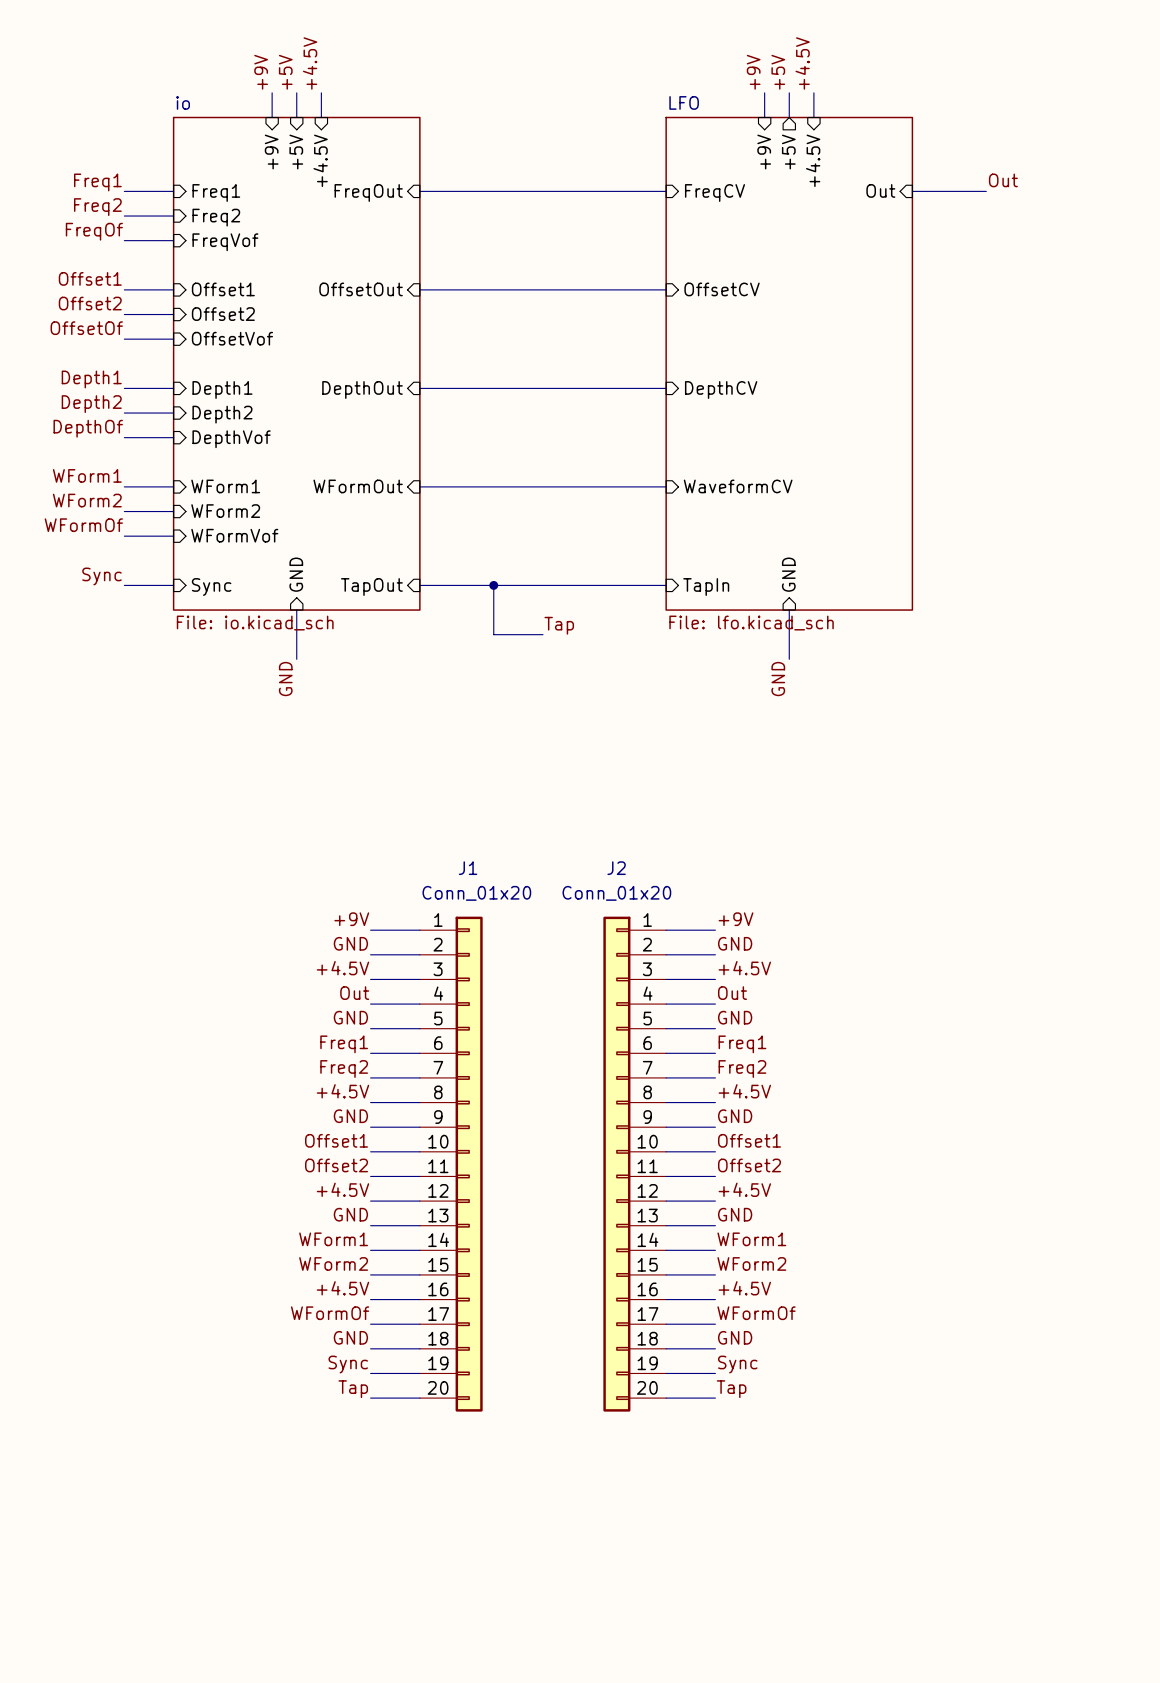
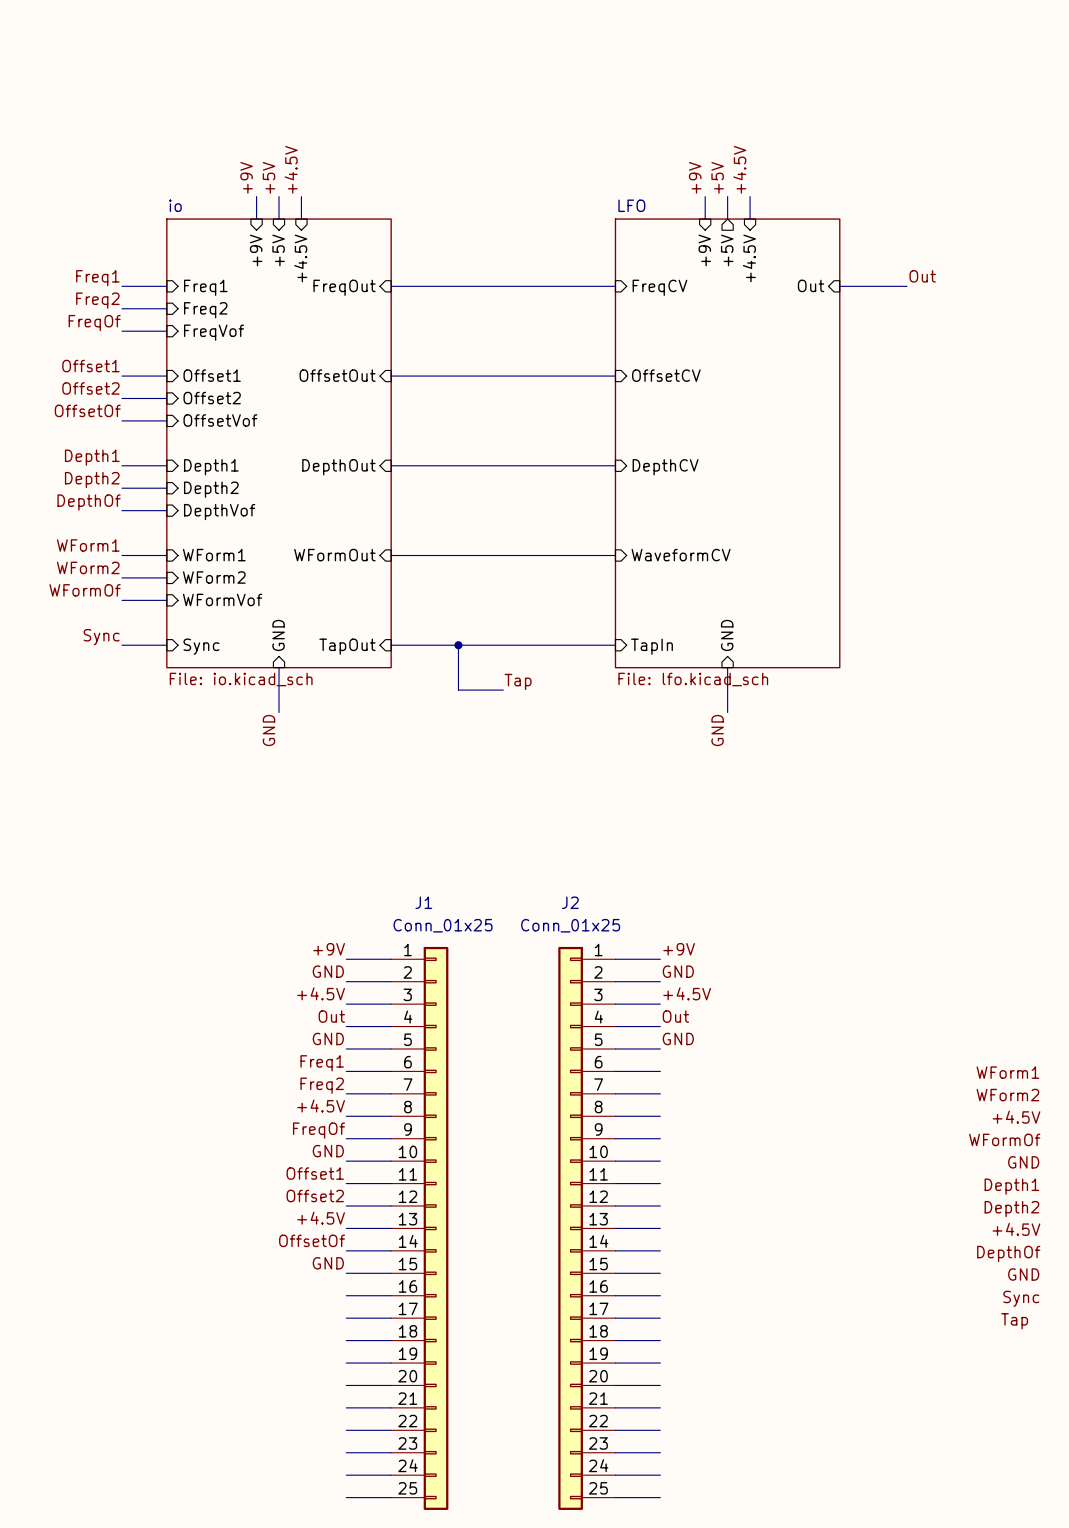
label position: +4.5V (310, 63) -> +4.5V (291, 169)
label position: +4.5V (802, 63) -> +4.5V (739, 169)
label position: +9V (261, 72) -> +9V (246, 177)
label position: +5V (285, 72) -> +5V (268, 177)
label position: +9V (753, 72) -> +9V (695, 177)
label position: +5V (778, 72) -> +5V (717, 177)
wire: (272, 92) (272, 117) -> (256, 196) (256, 219)
wire: (296, 92) (296, 117) -> (279, 196) (279, 219)
wire: (321, 92) (321, 117) -> (301, 196) (301, 219)
wire: (764, 92) (764, 117) -> (705, 196) (705, 219)
wire: (789, 92) (789, 117) -> (727, 196) (727, 219)
wire: (813, 92) (813, 117) -> (750, 196) (750, 219)
sheet pin position: +9V (271, 152) -> +9V (256, 250)
sheet pin position: +5V (296, 152) -> +5V (278, 250)
sheet pin position: +9V (764, 152) -> +9V (704, 250)
sheet pin position: +5V (788, 152) -> +5V (727, 250)
sheet pin position: +4.5V (320, 160) -> +4.5V (300, 258)
sheet pin position: +4.5V (813, 160) -> +4.5V (749, 258)
label position: Out (1003, 180) -> Out (922, 276)
label: Freq1 (97, 182) -> none
sheet pin position: Out (880, 190) -> Out (811, 285)
wire: (124, 191) (173, 191) -> none
wire: (419, 191) (666, 191) -> (391, 286) (615, 286)
wire: (912, 191) (986, 191) -> (839, 286) (907, 286)
sheet pin: Freq1 (216, 192) -> none
sheet pin position: FreqOut (368, 192) -> FreqOut (344, 287)
sheet pin position: FreqCV (715, 192) -> FreqCV (659, 287)
label: Freq2 (97, 207) -> none
wire: (124, 216) (173, 216) -> none
sheet pin: Freq2 (216, 217) -> none
label position: FreqOf (94, 231) -> FreqOf (94, 323)
wire: (124, 240) (173, 240) -> (121, 331) (166, 331)
sheet pin position: FreqVof (225, 242) -> FreqVof (214, 332)
label: Offset1 (90, 278) -> none
wire: (124, 289) (173, 289) -> none
sheet pin: Offset1 (223, 289) -> none
sheet pin position: OffsetOut (361, 289) -> OffsetOut (337, 375)
wire: (419, 289) (666, 289) -> (391, 376) (615, 376)
sheet pin position: OffsetCV (722, 289) -> OffsetCV (666, 375)
label: Offset2 (90, 303) -> Freq1 (97, 278)
sheet pin: Offset2 (223, 314) -> Freq1 (205, 287)
label: OffsetOf (86, 328) -> Freq2 (97, 300)
sheet pin: OffsetVof (232, 338) -> Freq2 (205, 310)
sheet io position: (296, 363) -> (279, 443)
sheet LFO position: (789, 363) -> (727, 443)
label: Depth1 (91, 379) -> none
wire: (124, 388) (173, 388) -> (121, 420) (166, 420)
wire: (419, 388) (666, 388) -> (391, 465) (615, 465)
sheet pin: Depth1 (222, 389) -> none
sheet pin position: DepthOut (362, 389) -> DepthOut (338, 467)
sheet pin position: DepthCV (721, 389) -> DepthCV (665, 467)
label: Depth2 (91, 404) -> Offset1 (90, 366)
sheet pin: Depth2 (222, 414) -> Offset1 (212, 375)
label: DepthOf (88, 428) -> Offset2 (90, 388)
sheet pin: DepthVof (231, 439) -> Offset2 (212, 398)
label: none -> OffsetOf (87, 410)
sheet pin: none -> OffsetVof (220, 420)
label position: WForm1 (87, 475) -> WForm1 (88, 545)
wire: (124, 486) (173, 486) -> (121, 555) (166, 555)
sheet pin position: WForm1 (225, 486) -> WForm1 (214, 555)
sheet pin position: WFormOut (358, 486) -> WFormOut (334, 555)
wire: (419, 486) (666, 486) -> (391, 555) (615, 555)
sheet pin position: WaveformCV (738, 486) -> WaveformCV (681, 555)
label: WForm2 (87, 500) -> Depth1 (92, 457)
sheet pin: WForm2 (225, 511) -> Depth1 (211, 467)
label: WFormOf (83, 525) -> Depth2 (92, 480)
sheet pin: WFormVof (234, 535) -> Depth2 (211, 489)
label: none -> DepthOf (89, 502)
wire: none -> (121, 510) (166, 510)
sheet pin: none -> DepthVof (219, 512)
sheet pin position: GND (296, 574) -> GND (278, 635)
sheet pin position: GND (788, 574) -> GND (727, 635)
label position: Sync (101, 576) -> Sync (101, 637)
wire: (124, 585) (173, 585) -> (121, 645) (166, 645)
wire: (419, 585) (666, 585) -> (391, 645) (615, 645)
wire: (493, 585) (493, 634) (543, 634) -> (458, 645) (458, 690) (503, 690)
junction: (493, 585) -> none
sheet pin position: Sync (211, 587) -> Sync (201, 646)
sheet pin position: TapOut (371, 587) -> TapOut (347, 646)
sheet pin position: TapIn (706, 587) -> TapIn (651, 646)
wire: (296, 610) (296, 659) -> (279, 667) (279, 712)
wire: (789, 610) (789, 659) -> (727, 667) (727, 712)
label: none -> WForm2 (88, 567)
label position: Tap (559, 625) -> Tap (518, 681)
wire: none -> (121, 577) (166, 577)
sheet pin: none -> WForm2 (214, 577)
label: none -> WFormOf (85, 590)
sheet pin: none -> WFormVof (222, 599)
wire: none -> (121, 600) (166, 600)
label: GND (285, 679) -> none
label: GND (778, 679) -> none
junction: none -> (458, 645)
label: none -> GND (268, 730)
label: none -> GND (717, 730)
J1 name position: J1 (468, 868) -> J1 (423, 902)
J2 name position: J2 (616, 868) -> J2 (570, 902)
J1 value: Conn_01x20 (476, 893) -> Conn_01x25 (443, 925)
J2 value: Conn_01x20 (616, 893) -> Conn_01x25 (570, 925)
J1 symbol: [419, 916, 483, 1412] -> [391, 946, 449, 1510]
J2 symbol: [603, 916, 667, 1412] -> [558, 946, 616, 1510]
label: +9V (351, 919) -> none
label: +9V (736, 919) -> none
wire: (370, 930) (419, 930) -> none
wire: (666, 930) (715, 930) -> none
label: GND (350, 943) -> none
label: GND (735, 943) -> none
wire: (370, 954) (419, 954) -> none
wire: (666, 954) (715, 954) -> none
label: +4.5V (342, 968) -> none
label: +4.5V (744, 968) -> none
wire: (370, 979) (419, 979) -> none
wire: (666, 979) (715, 979) -> none
label: Out (354, 993) -> none
label: Out (732, 993) -> none
wire: (370, 1004) (419, 1004) -> none
wire: (666, 1004) (715, 1004) -> none
label: GND (350, 1017) -> none
label: GND (735, 1017) -> none
wire: (370, 1028) (419, 1028) -> none
wire: (666, 1028) (715, 1028) -> none
label: Freq1 (344, 1044) -> +9V (329, 949)
label: Freq1 (742, 1044) -> +9V (679, 949)
label: Freq2 (344, 1069) -> GND (328, 971)
label: Freq2 (742, 1069) -> GND (678, 971)
label: GND (350, 1116) -> Out (331, 1016)
label: GND (735, 1116) -> Out (675, 1016)
label: Offset1 (336, 1140) -> GND (328, 1038)
label: Offset1 (749, 1140) -> GND (678, 1038)
label: Offset2 (336, 1165) -> Freq1 (322, 1063)
label: Offset2 (749, 1165) -> none
label: none -> WForm1 (1007, 1072)
label: +4.5V (342, 1189) -> Freq2 (322, 1085)
label: +4.5V (744, 1189) -> none
label: none -> WForm2 (1007, 1095)
label: GND (350, 1214) -> +4.5V (321, 1106)
label: GND (735, 1214) -> none
label: none -> +4.5V (1016, 1117)
label: WForm1 (333, 1239) -> FreqOf (318, 1130)
label: WForm1 (751, 1239) -> none
label: none -> WFormOf (1004, 1139)
label: WForm2 (333, 1263) -> GND (328, 1151)
label: WForm2 (751, 1263) -> none
label: none -> GND (1023, 1162)
label: +4.5V (342, 1288) -> Offset1 (315, 1173)
label: +4.5V (744, 1288) -> none
label: none -> Depth1 (1011, 1186)
label: WFormOf (330, 1313) -> Offset2 (315, 1195)
label: WFormOf (756, 1313) -> none
label: none -> Depth2 (1011, 1209)
label: GND (350, 1337) -> +4.5V (321, 1218)
label: GND (735, 1337) -> none
label: none -> +4.5V (1016, 1229)
label: Sync (348, 1364) -> OffsetOf (312, 1240)
label: Sync (737, 1364) -> none
label: none -> DepthOf (1008, 1253)
label: Tap (353, 1389) -> GND (328, 1263)
label: Tap (731, 1389) -> none
label: none -> GND (1023, 1274)
wire: none -> (346, 1295) (391, 1295)
wire: none -> (615, 1295) (660, 1295)
label: none -> Sync (1021, 1298)
wire: none -> (346, 1318) (391, 1318)
wire: none -> (615, 1318) (660, 1318)
label: none -> Tap (1014, 1321)
wire: none -> (346, 1340) (391, 1340)
wire: none -> (615, 1340) (660, 1340)
wire: none -> (346, 1363) (391, 1363)
wire: none -> (615, 1363) (660, 1363)
wire: none -> (346, 1385) (391, 1385)
wire: none -> (615, 1385) (660, 1385)
wire: none -> (346, 1407) (391, 1407)
wire: none -> (615, 1407) (660, 1407)
wire: none -> (346, 1430) (391, 1430)
wire: none -> (615, 1430) (660, 1430)
wire: none -> (346, 1452) (391, 1452)
wire: none -> (615, 1452) (660, 1452)
wire: none -> (346, 1475) (391, 1475)
wire: none -> (615, 1475) (660, 1475)
wire: none -> (346, 1497) (391, 1497)
wire: none -> (615, 1497) (660, 1497)

